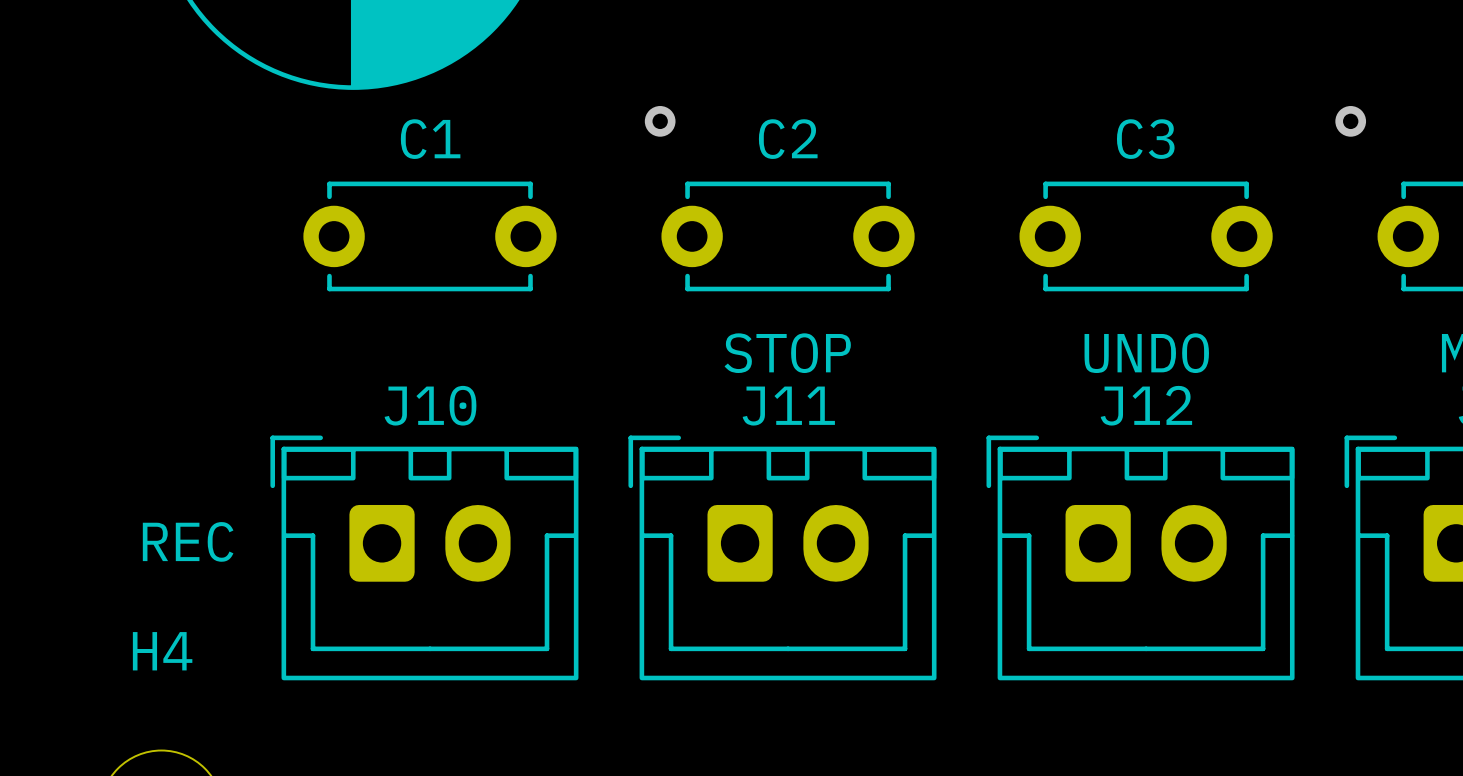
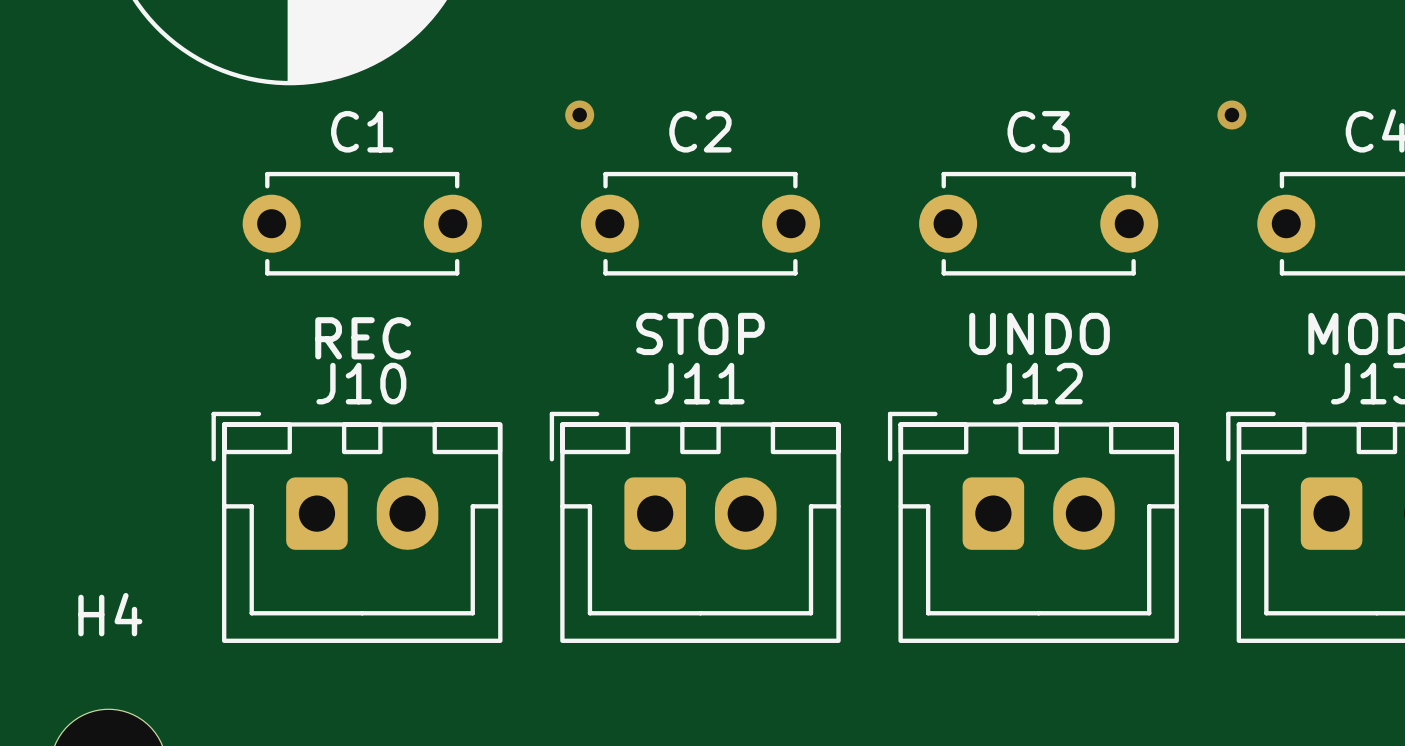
text position: REC (188, 541) -> REC (363, 338)

